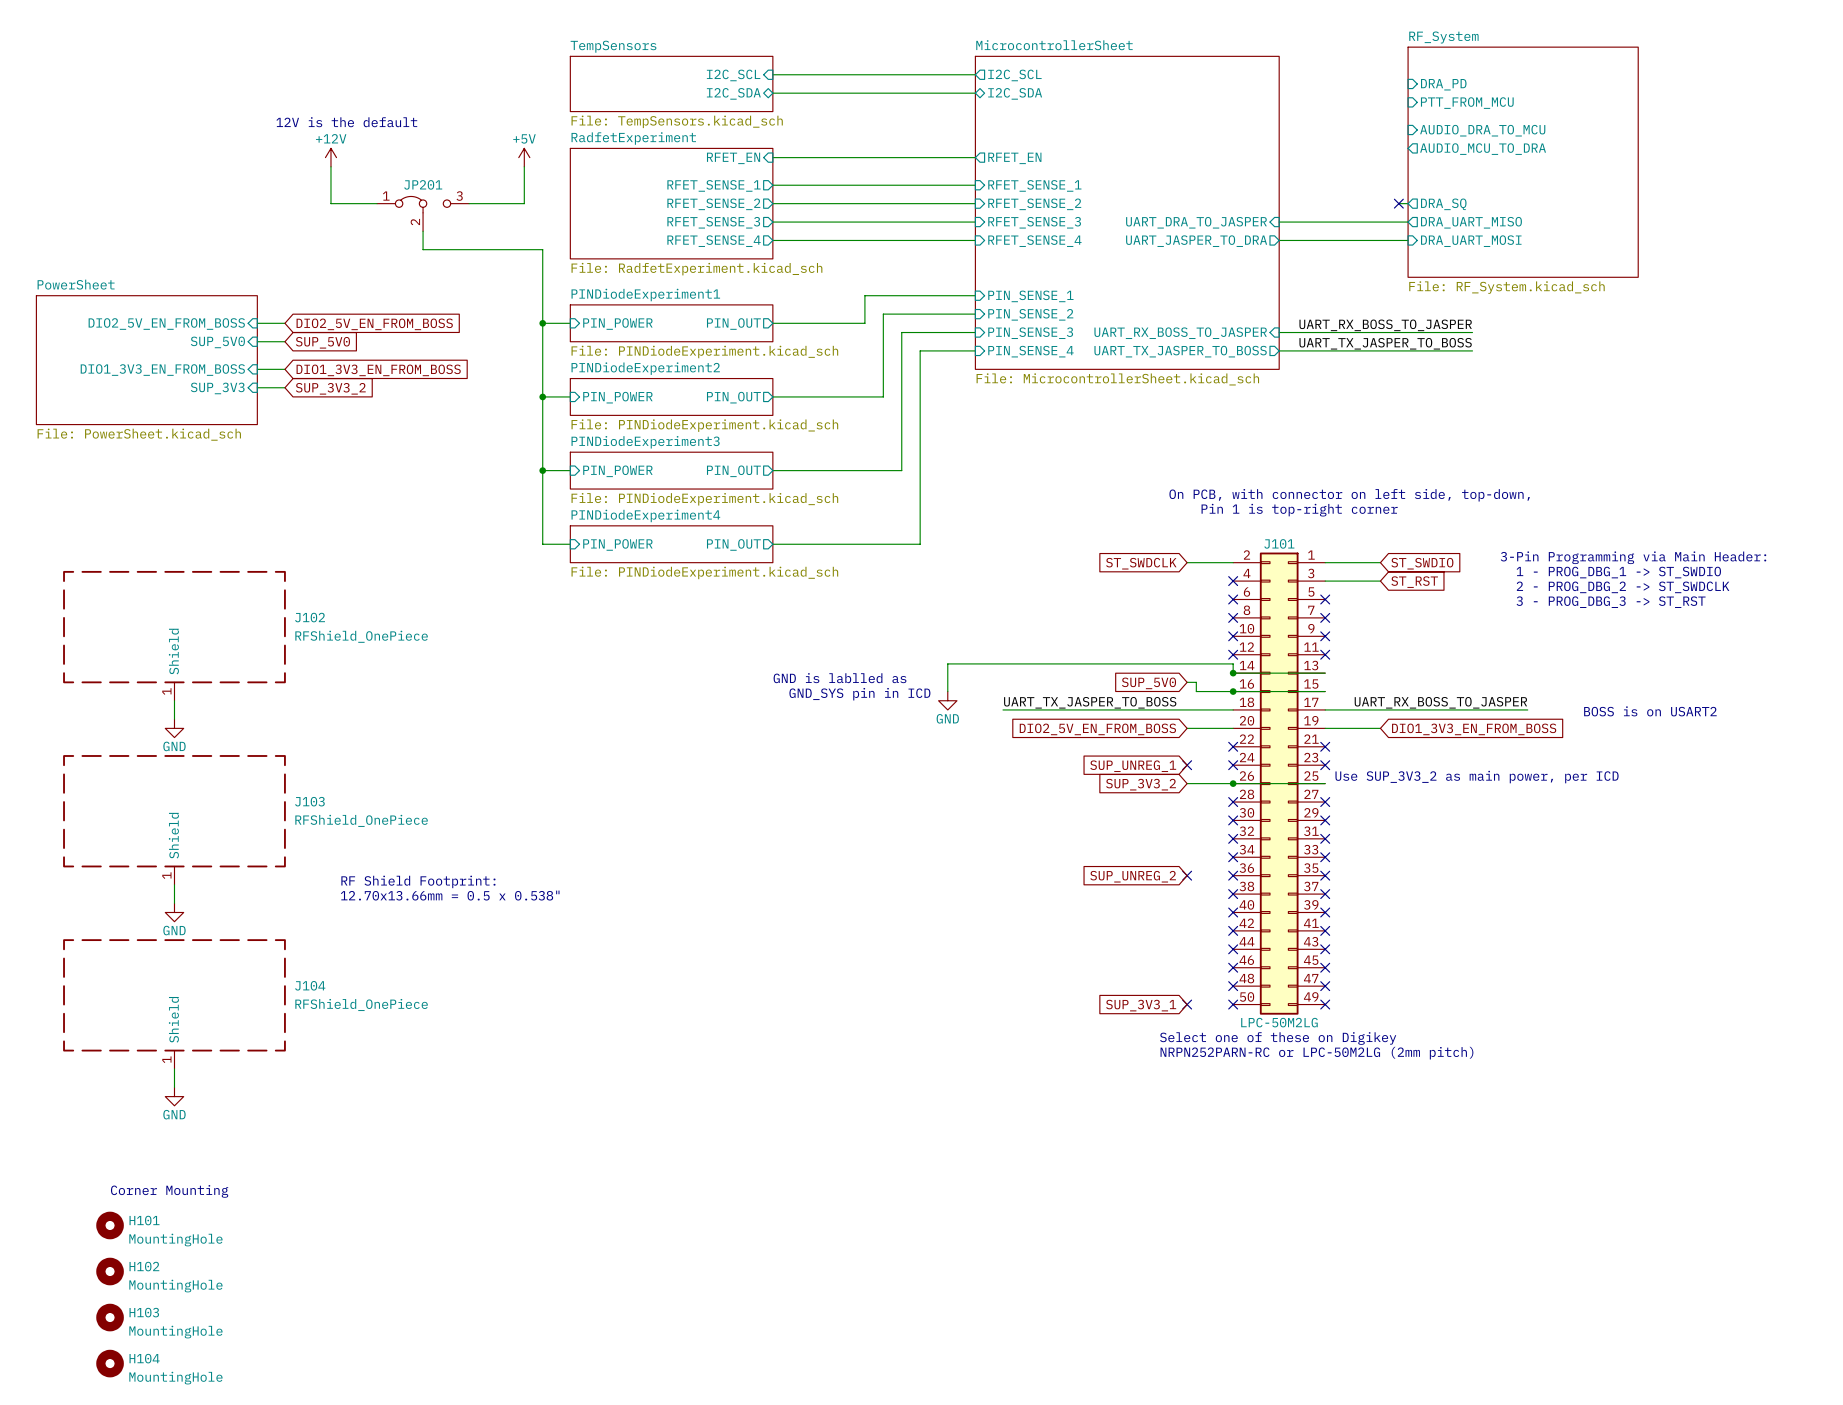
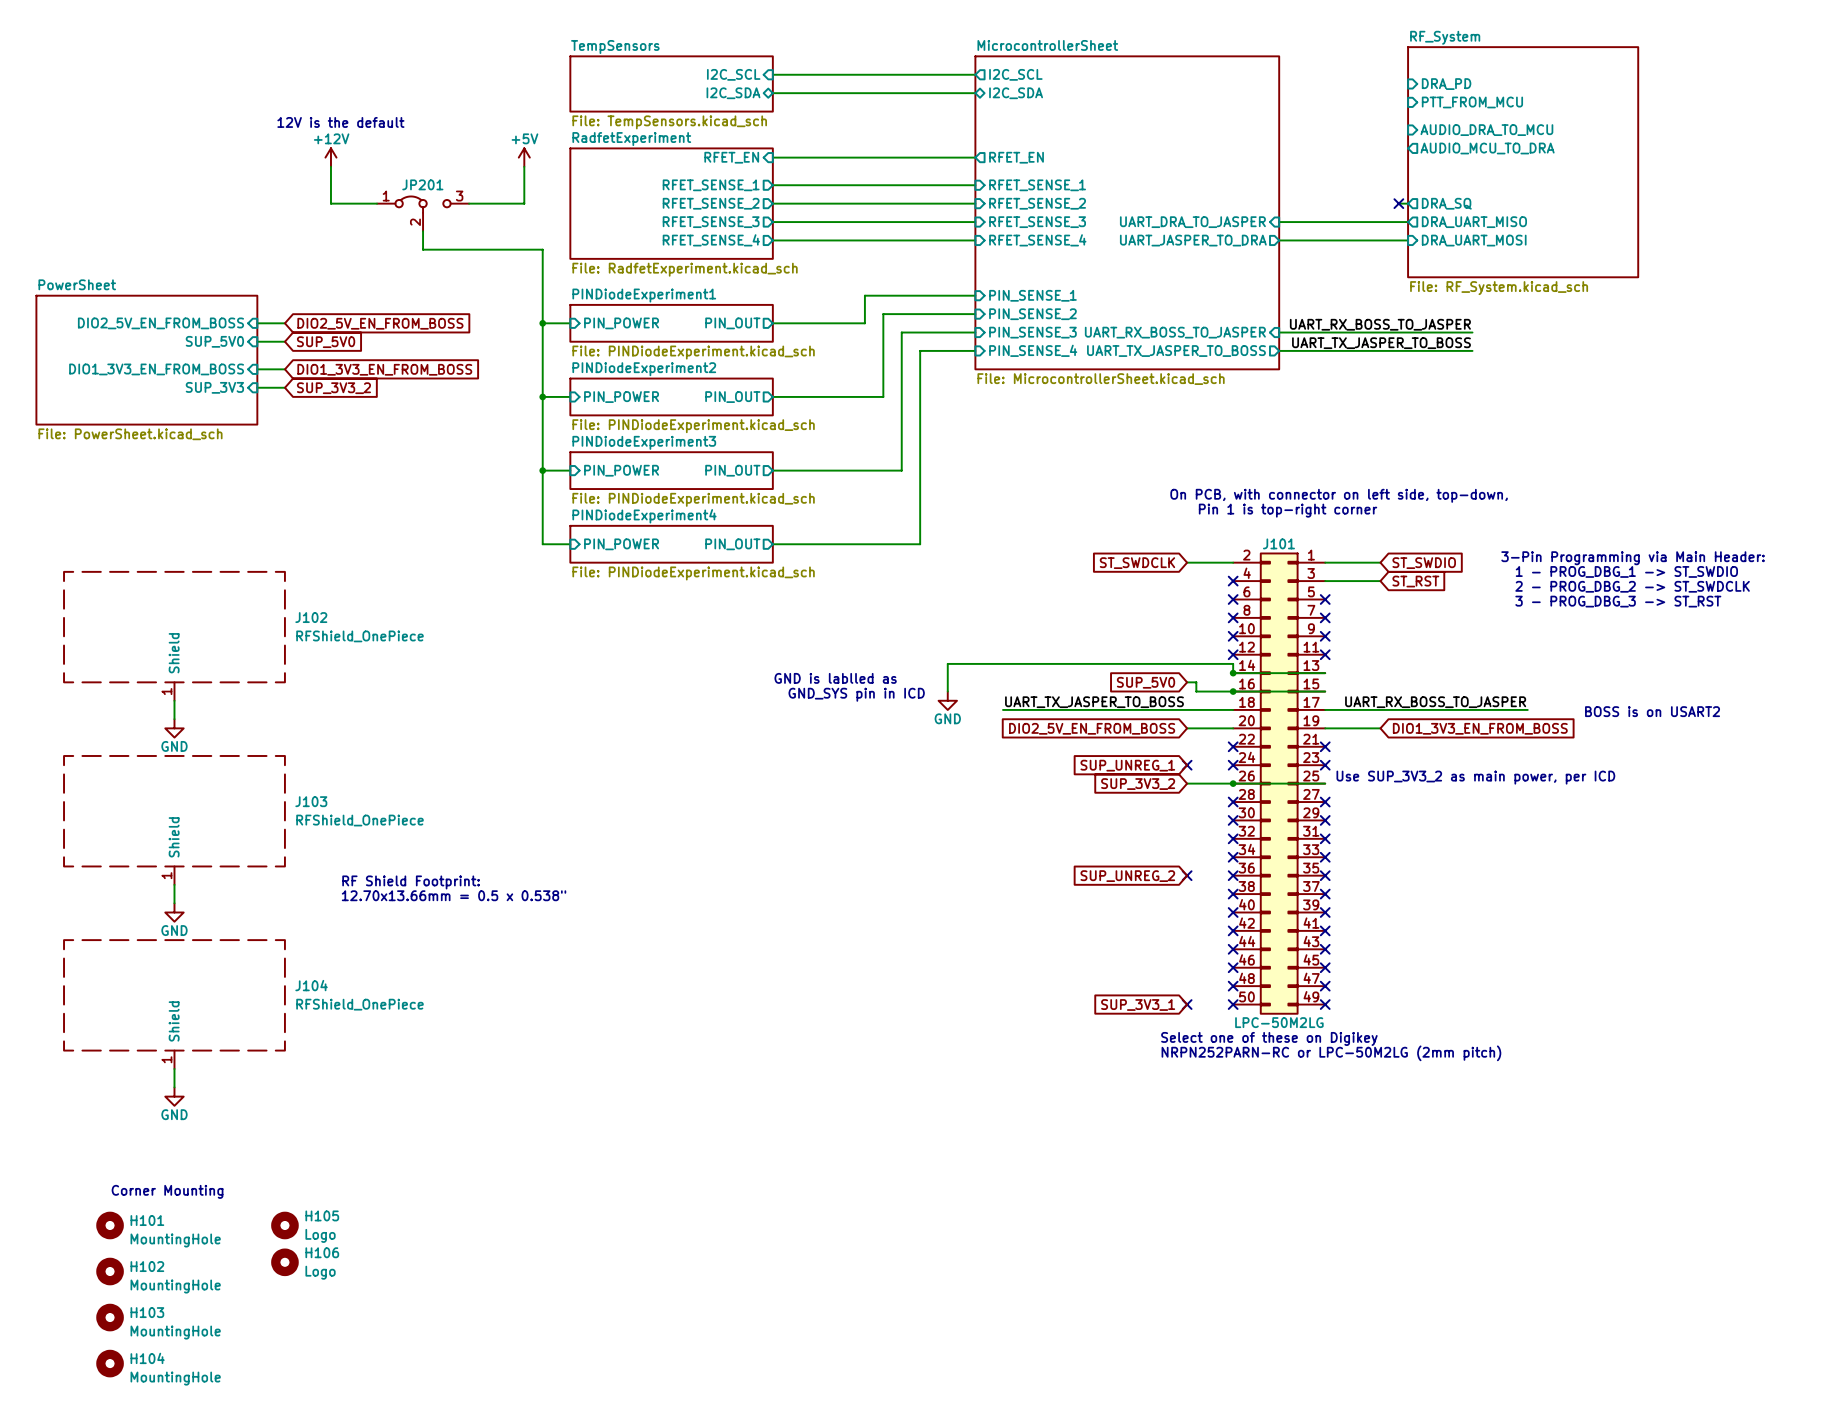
H105: none -> Logo (284, 1225)
H106: none -> Logo (284, 1262)

